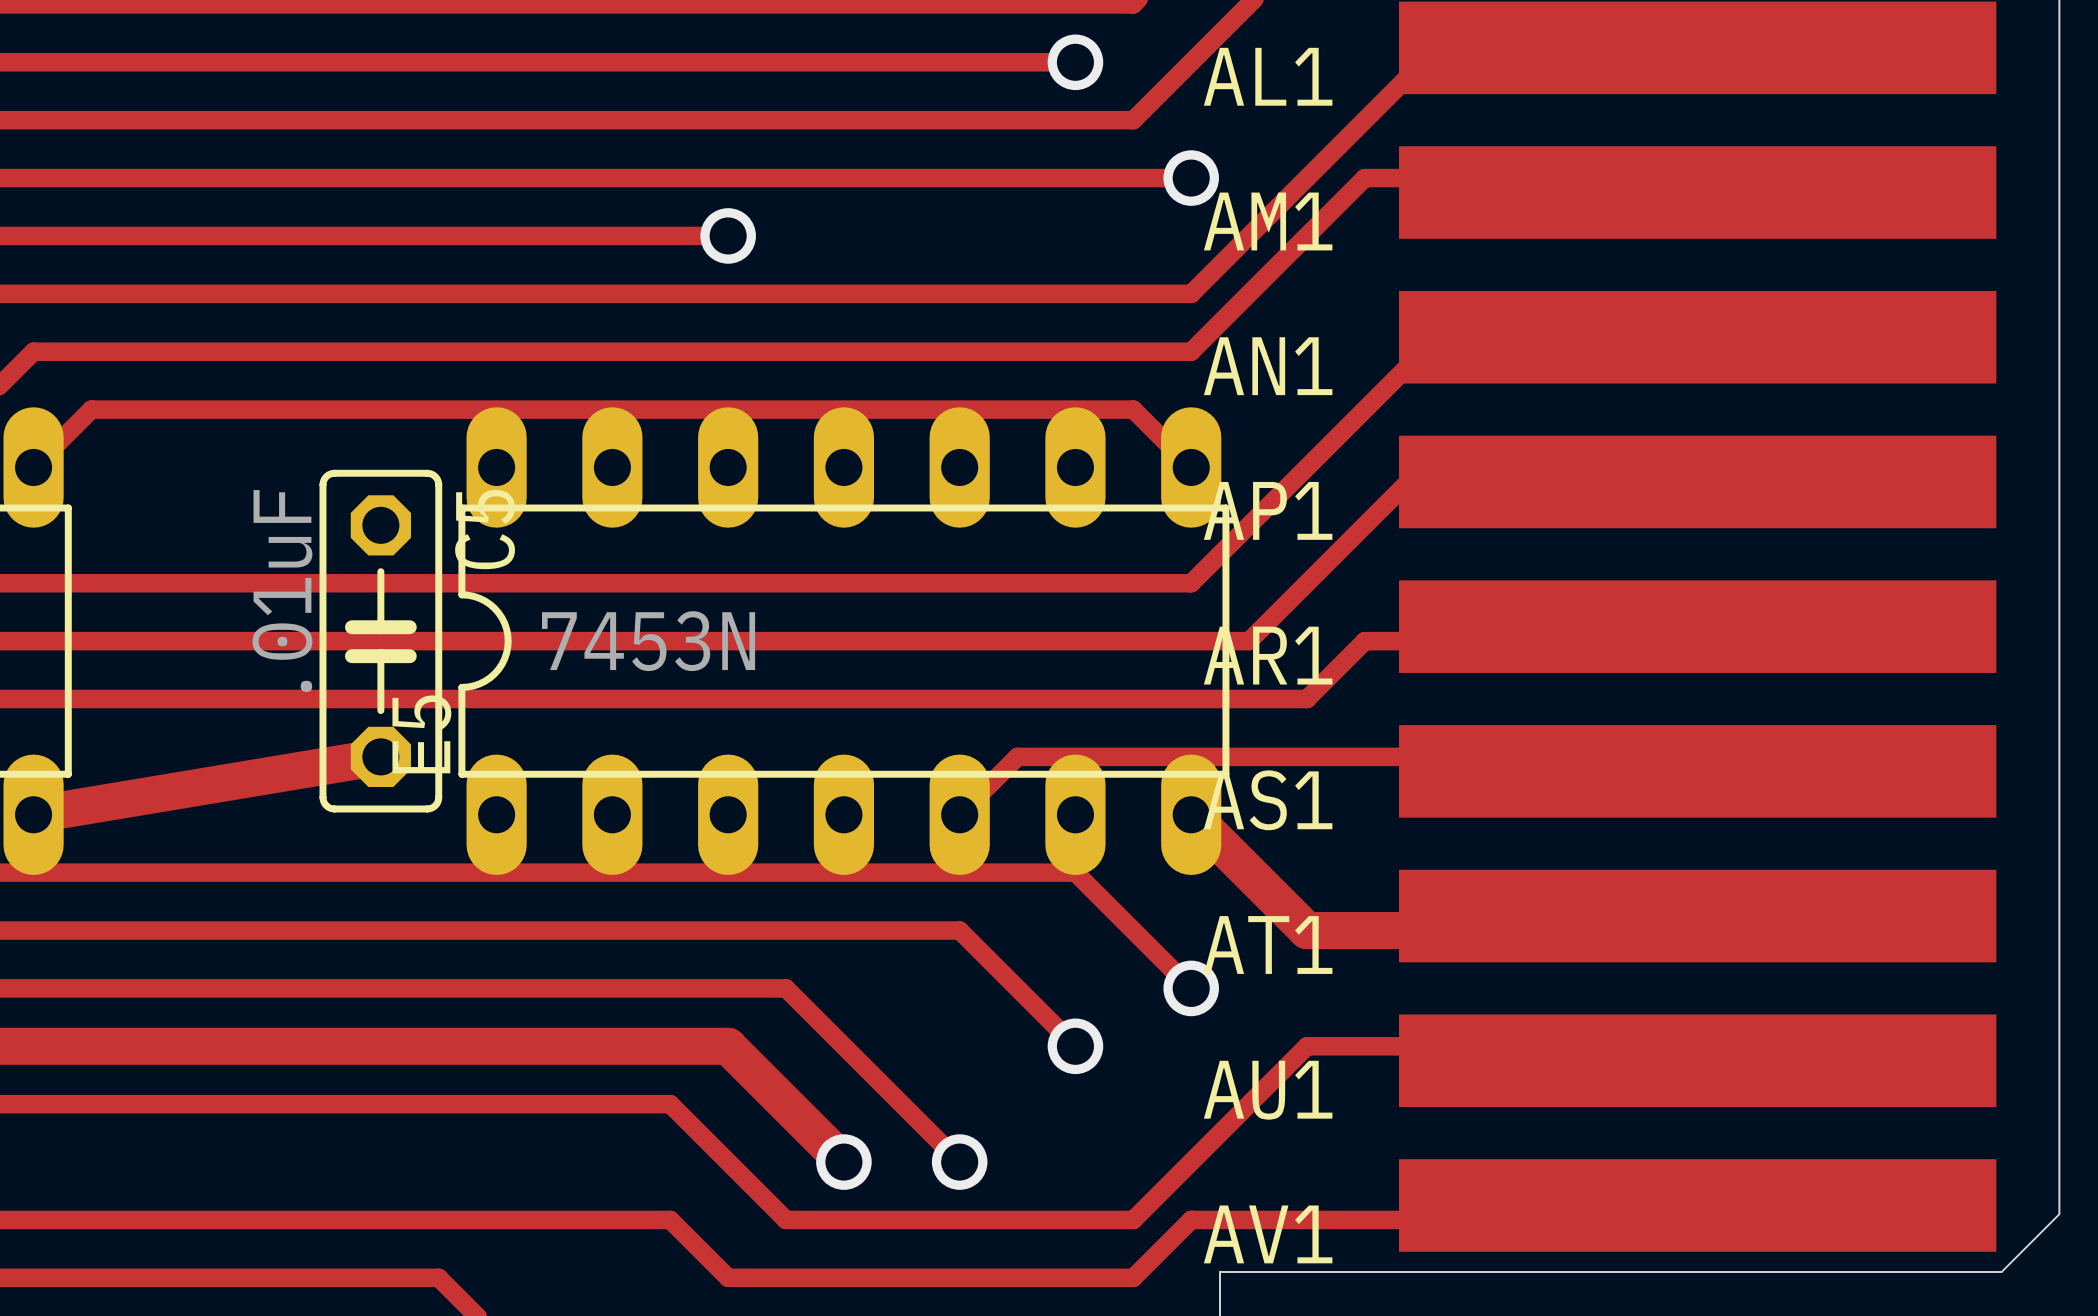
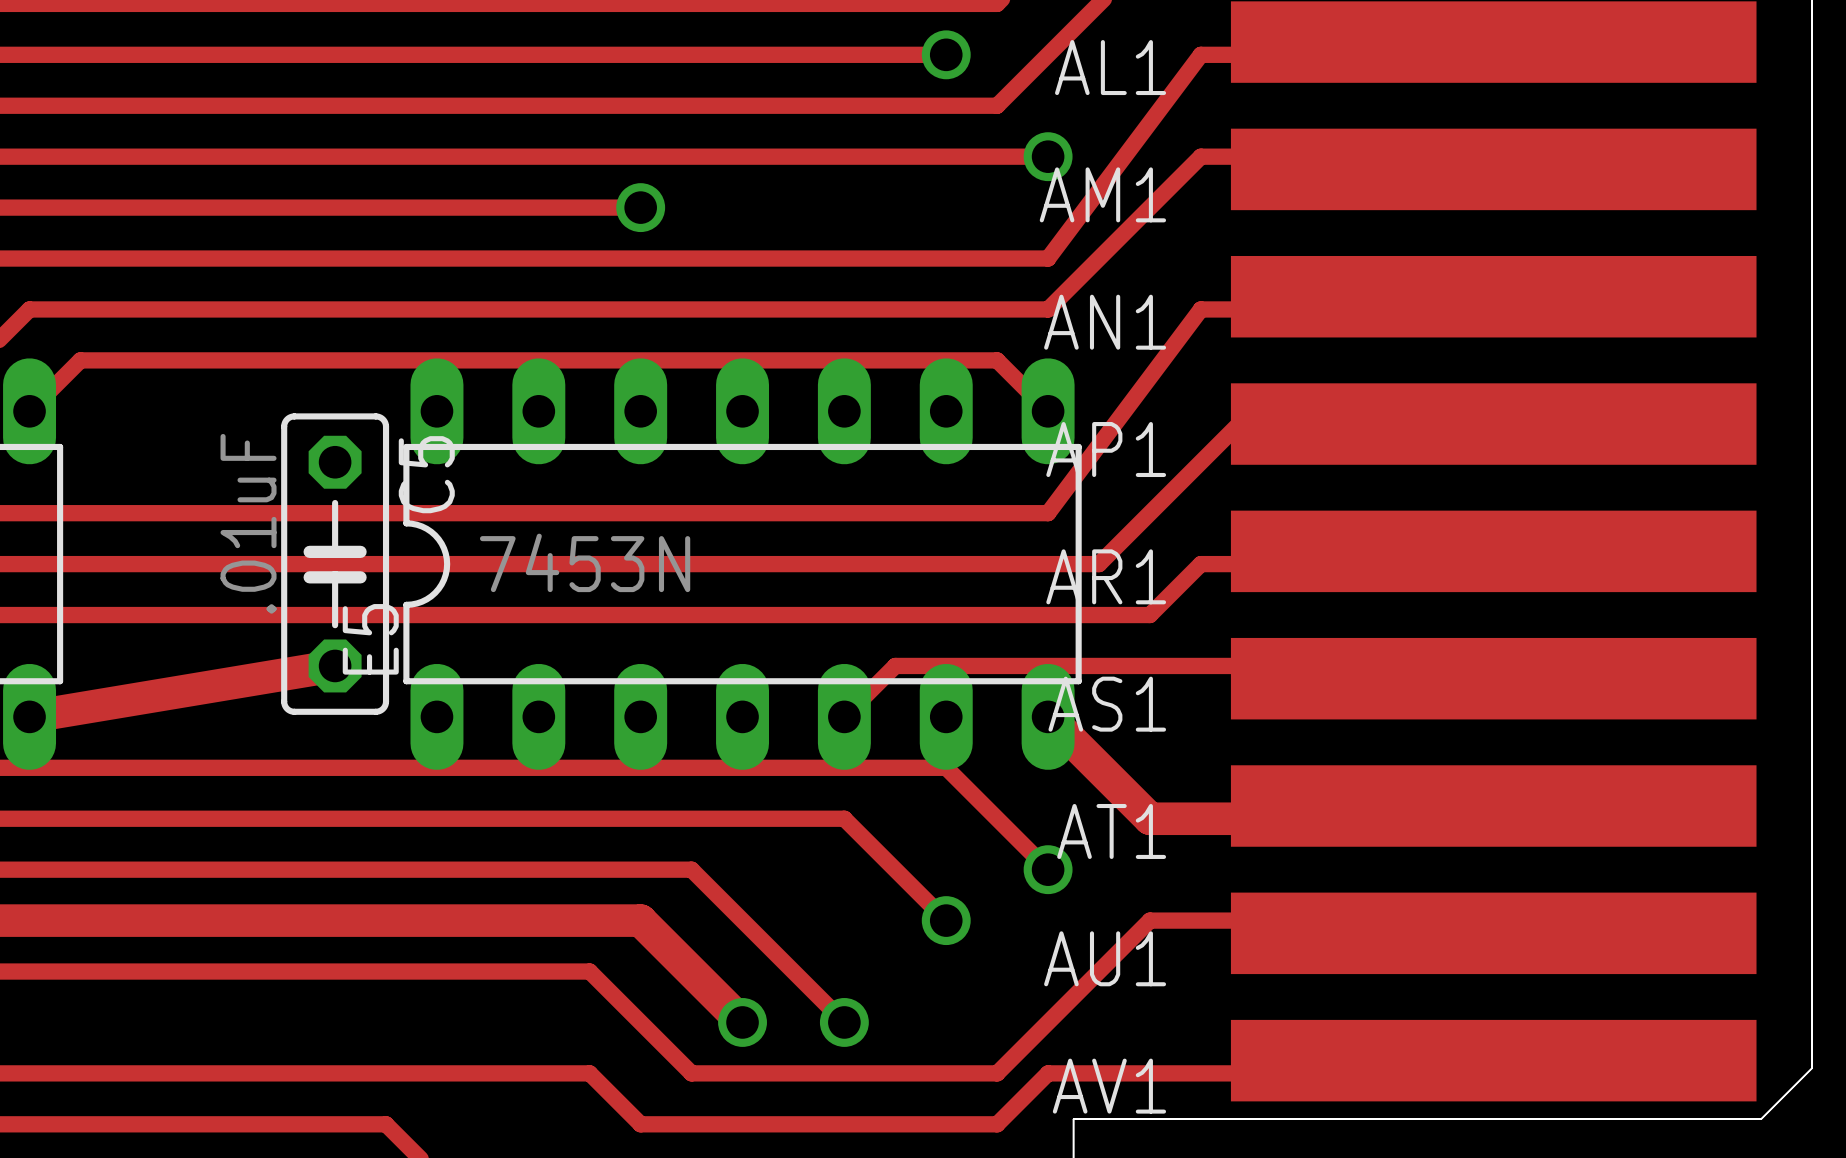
track: (1422, 62) (1191, 293) -> (1251, 54) (1200, 54) (1048, 258)
track: (1422, 351) (1191, 583) -> (1251, 309) (1200, 309) (1048, 513)

